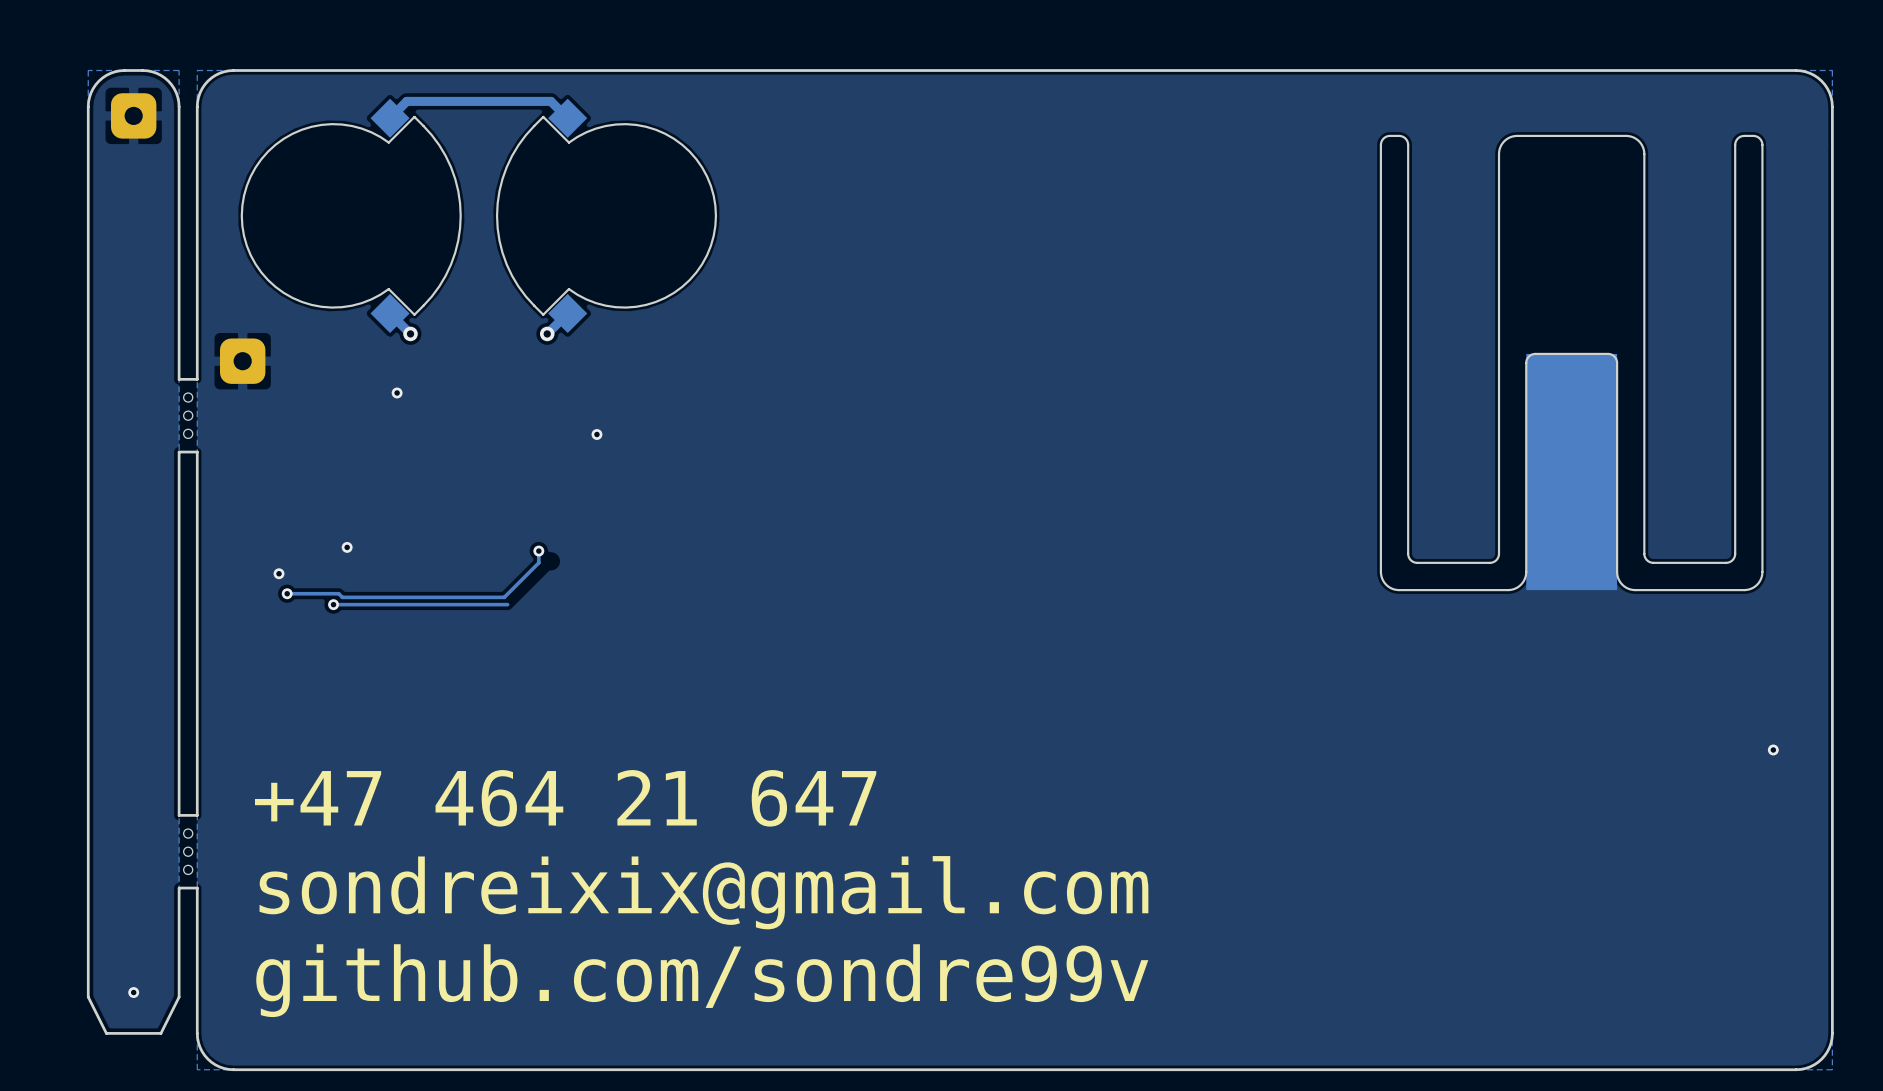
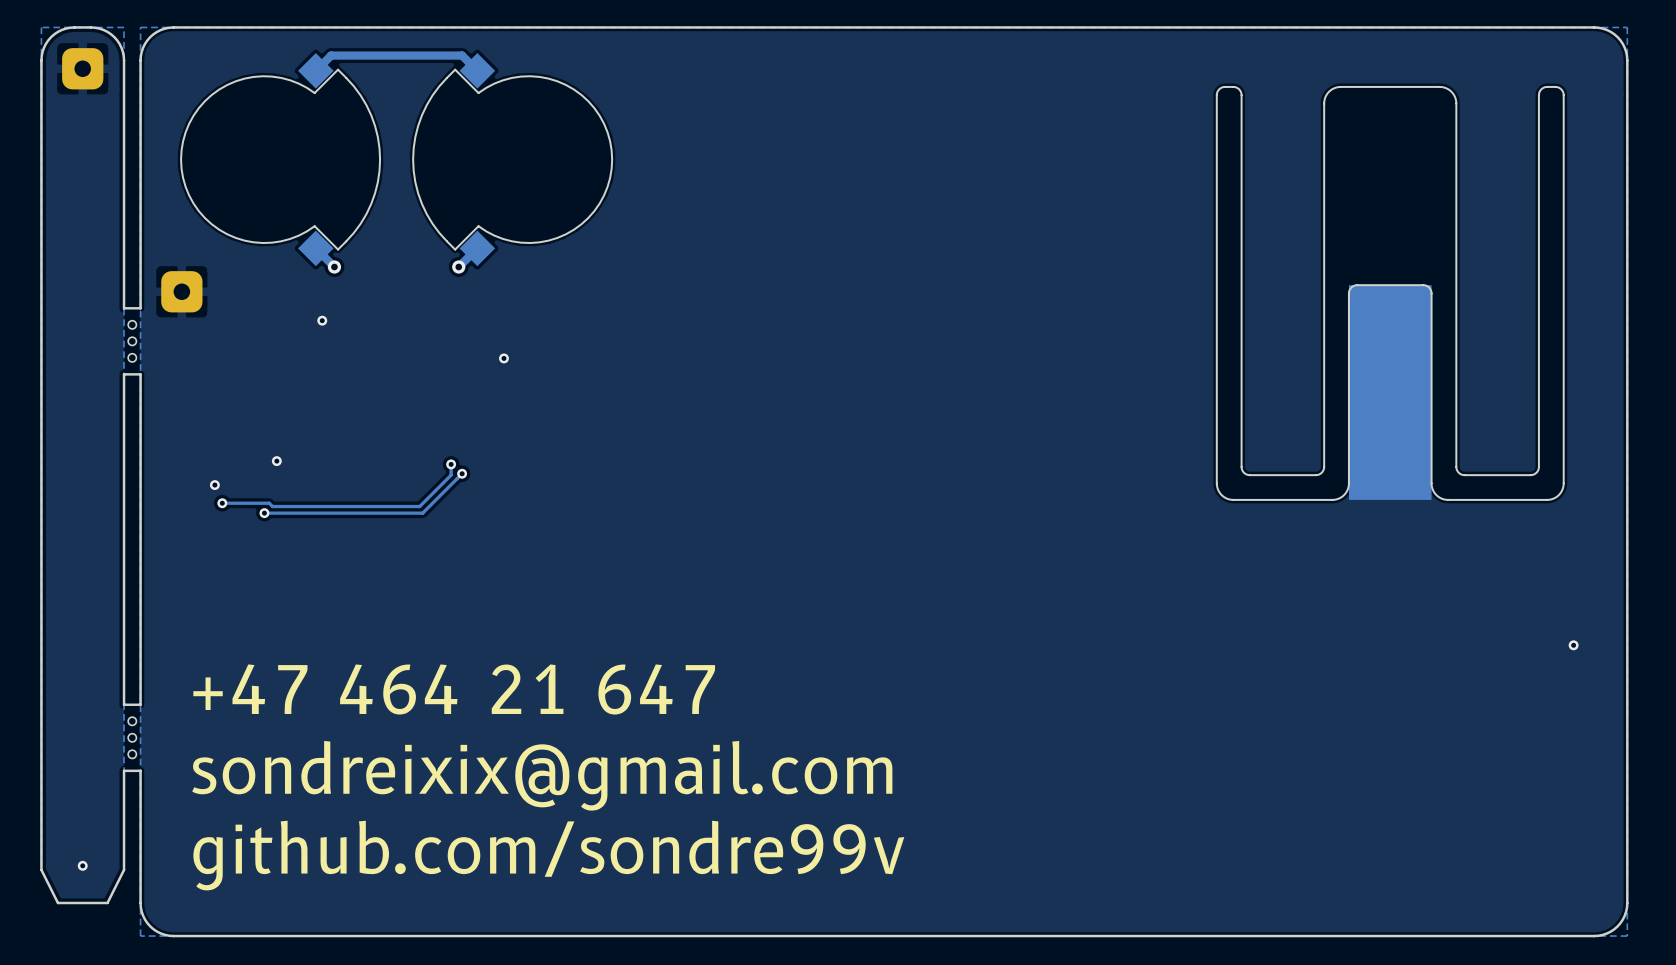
track: none -> (462, 473) (422, 513)
via: none -> (462, 473)

